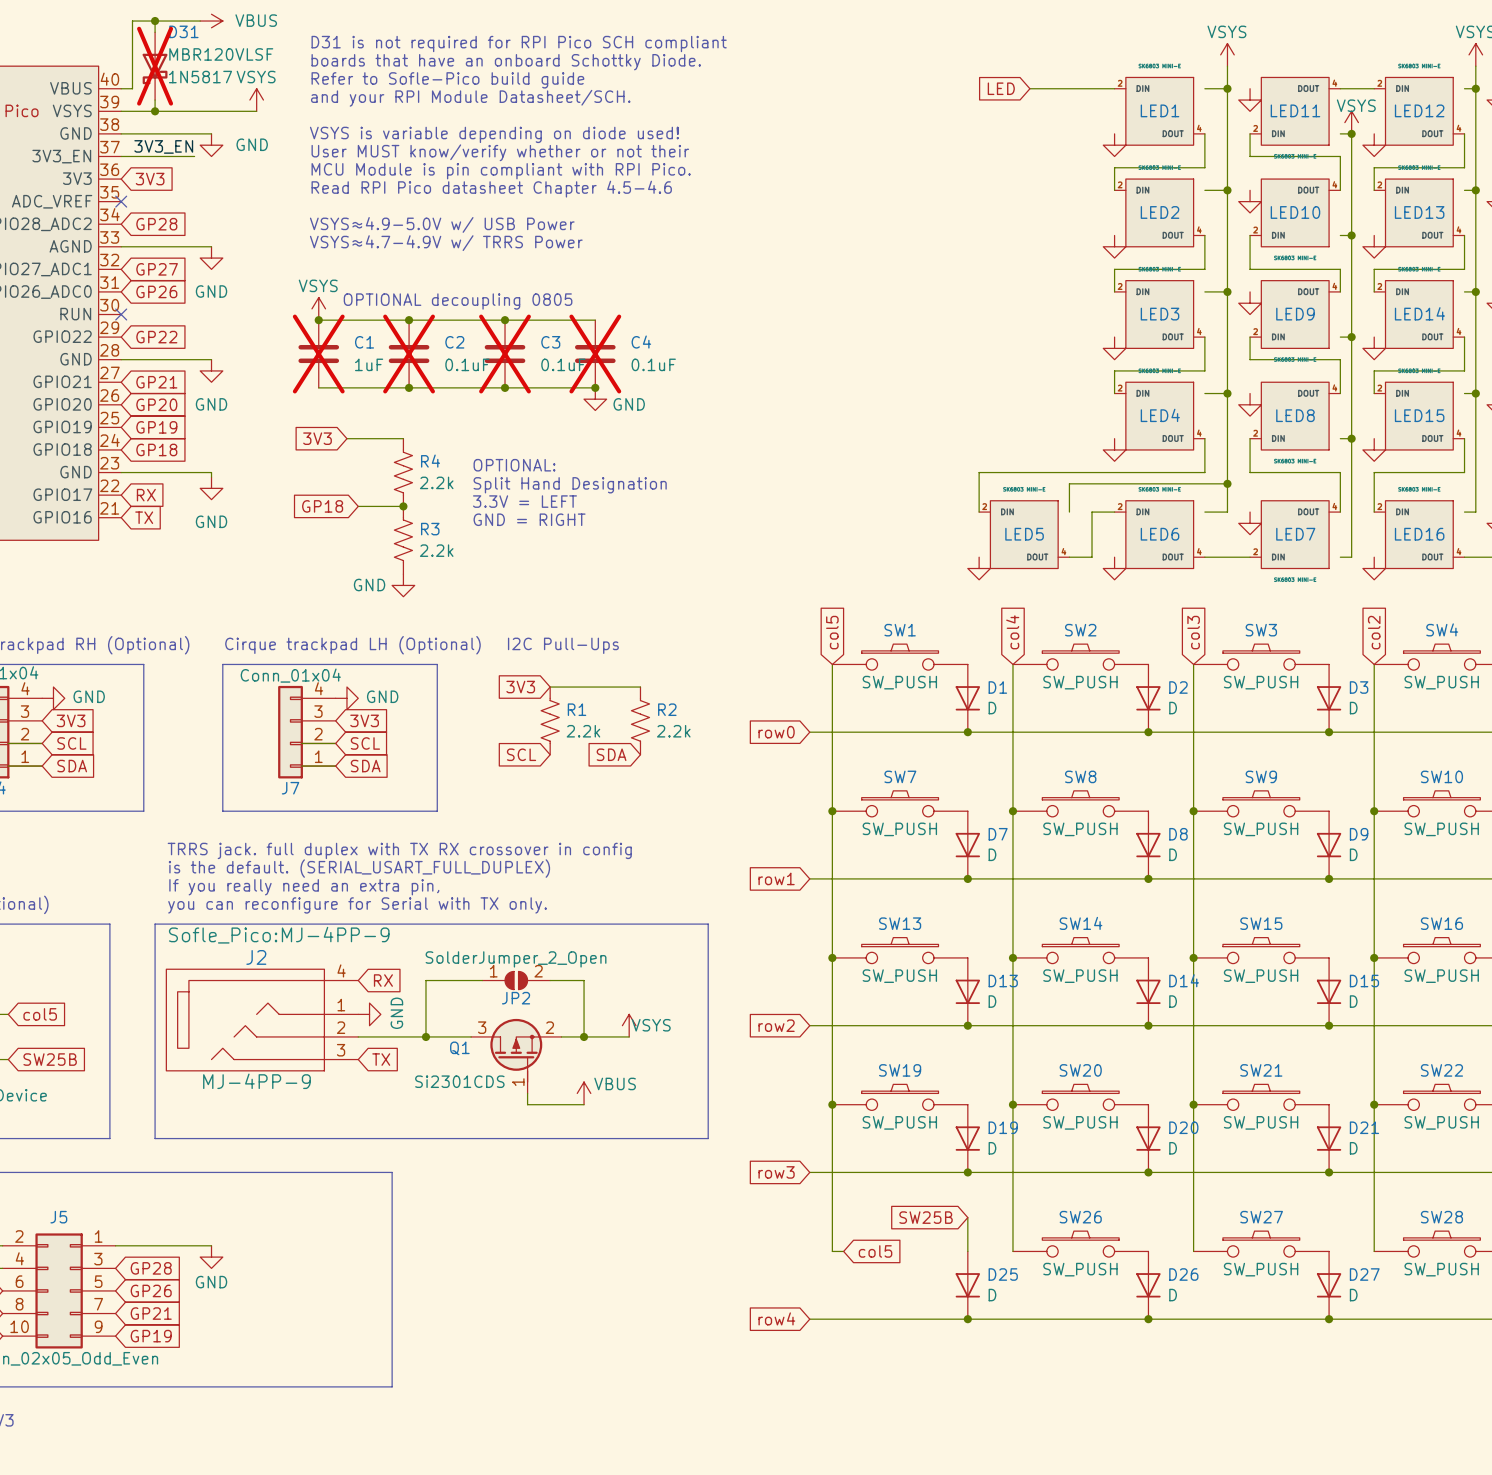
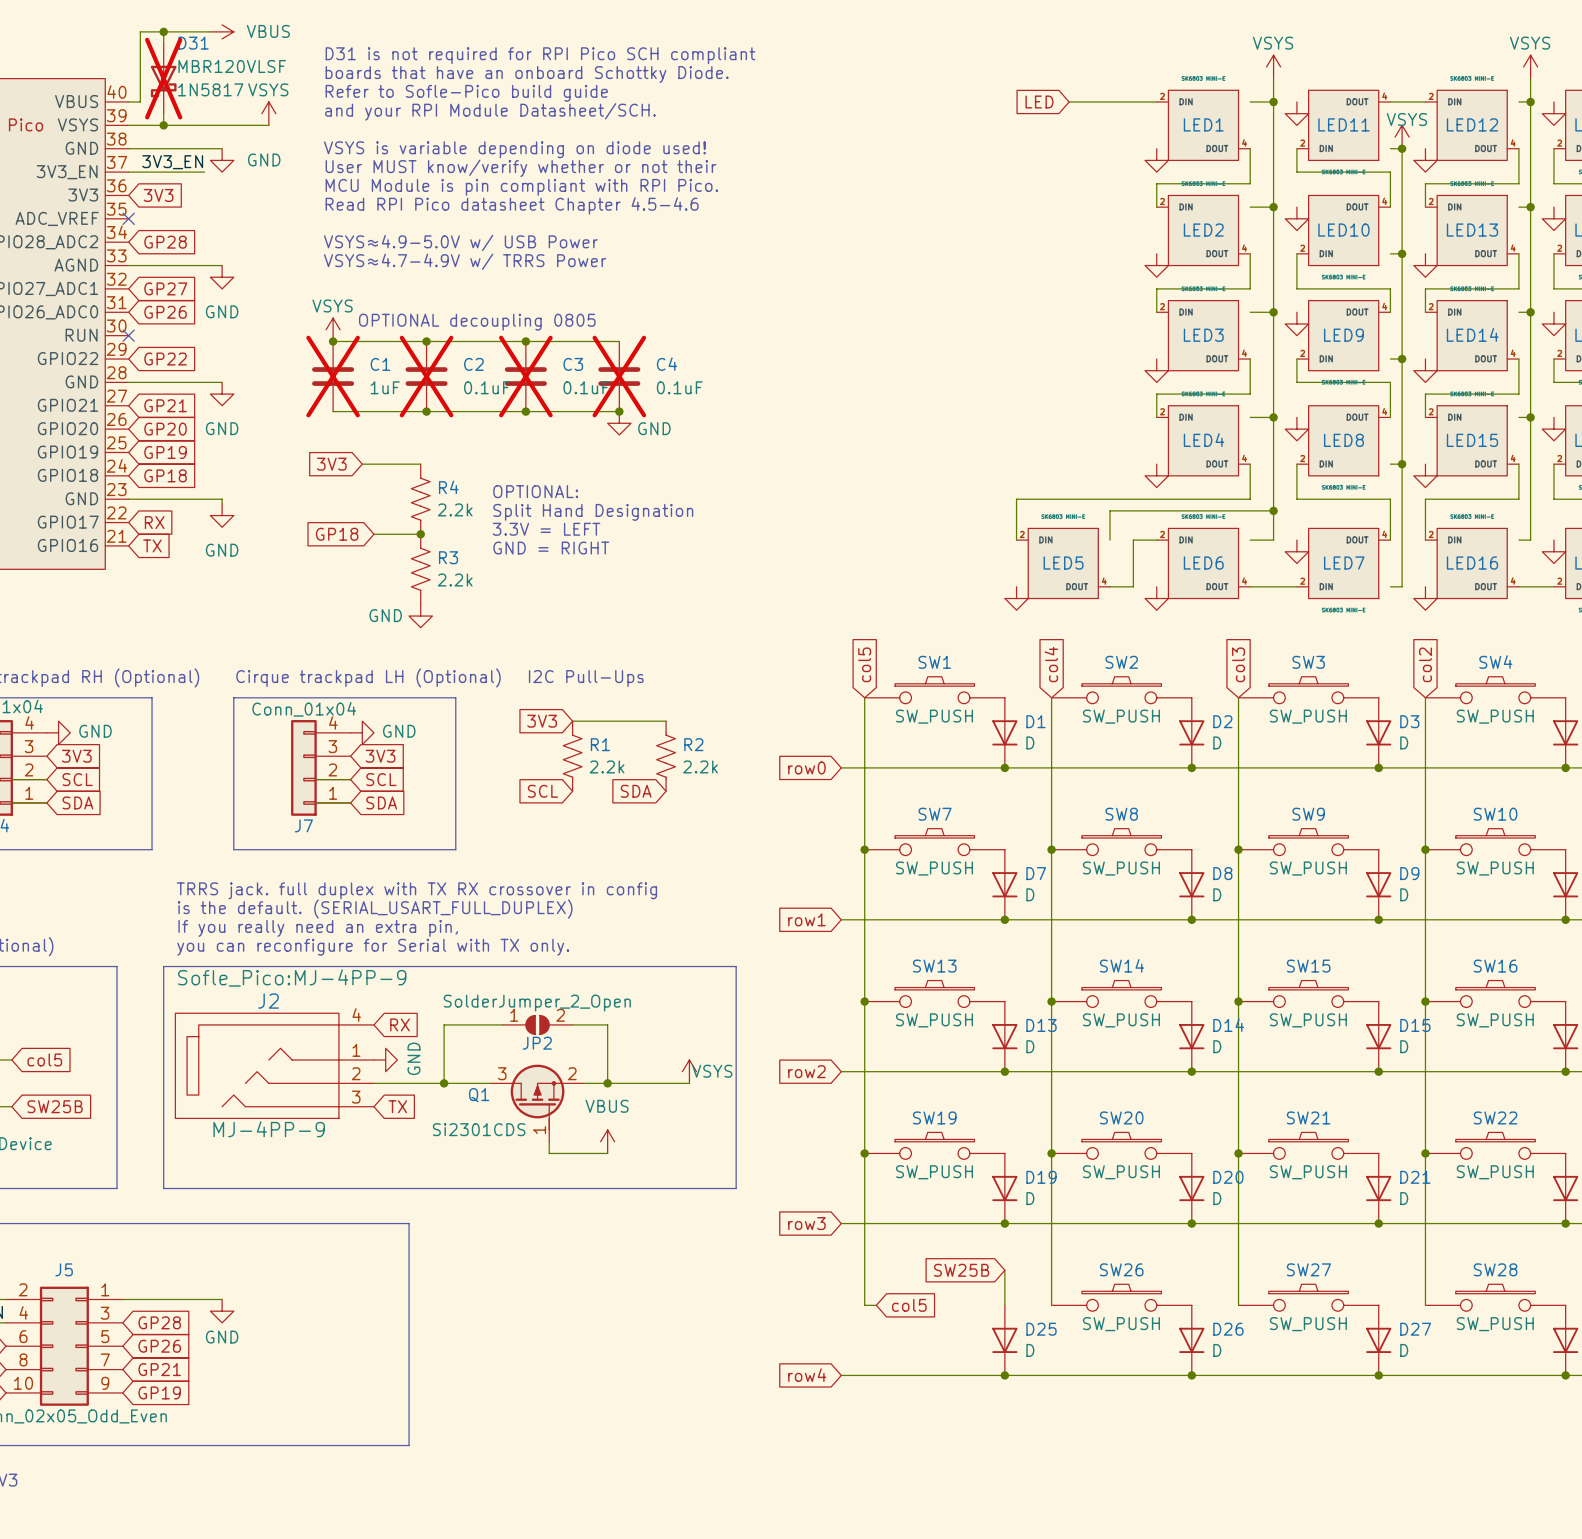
power symbol position: VSYS (629, 1025) -> VSYS (689, 1071)
wire: none -> (654, 1083) (689, 1083)
power symbol text position: VBUS (615, 1083) -> VBUS (607, 1106)

